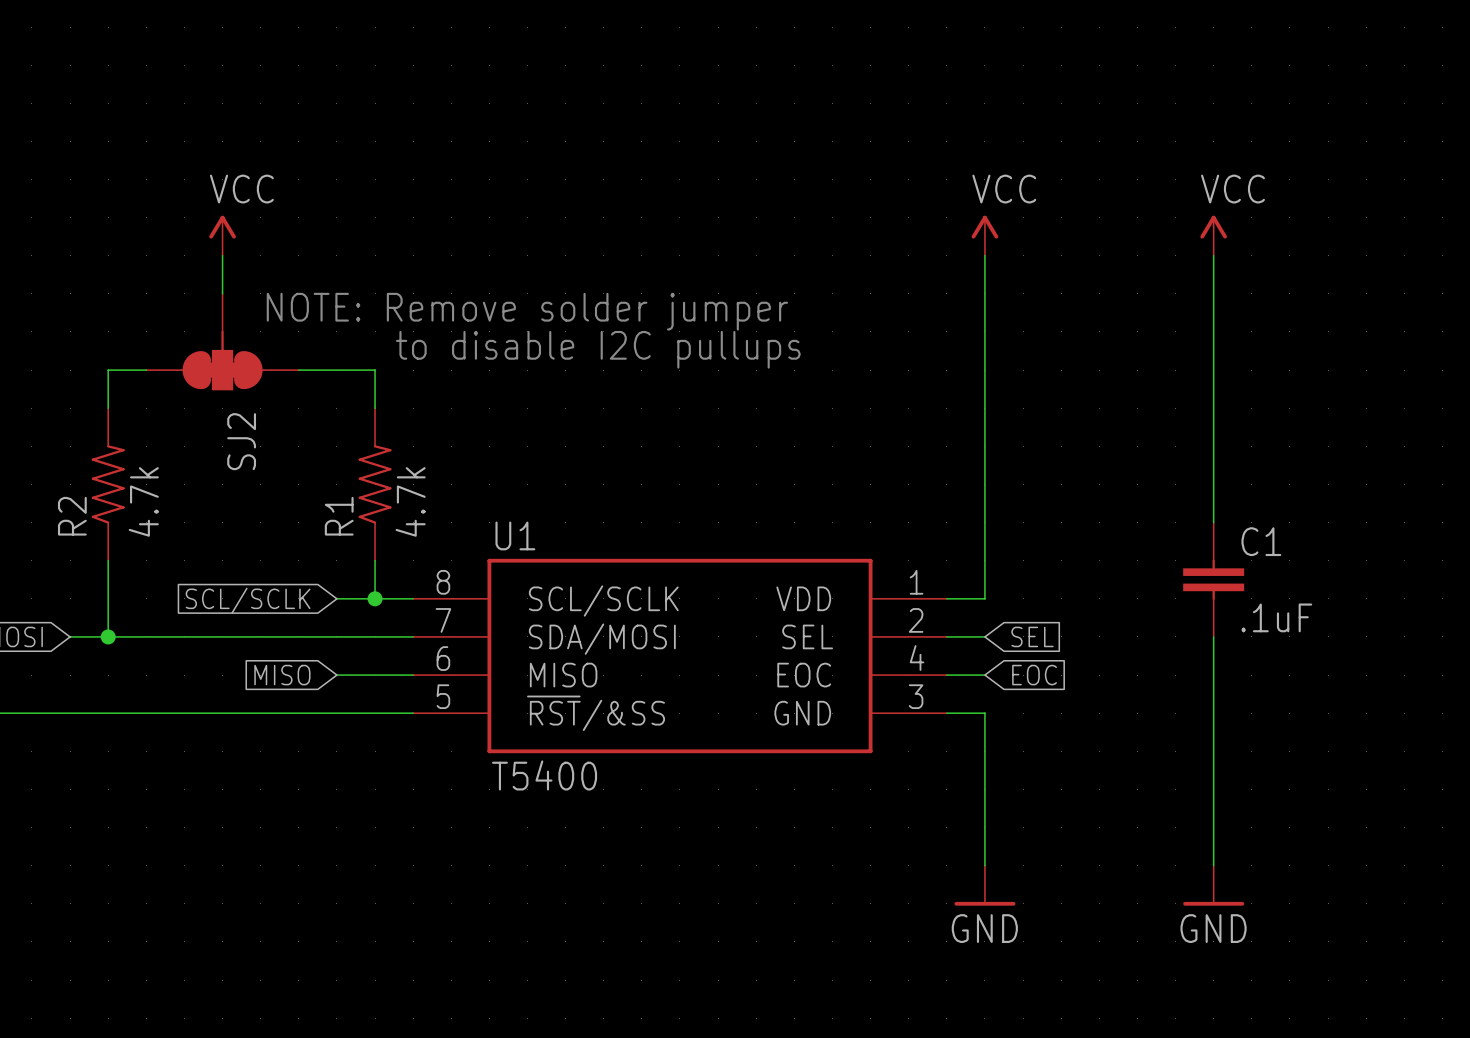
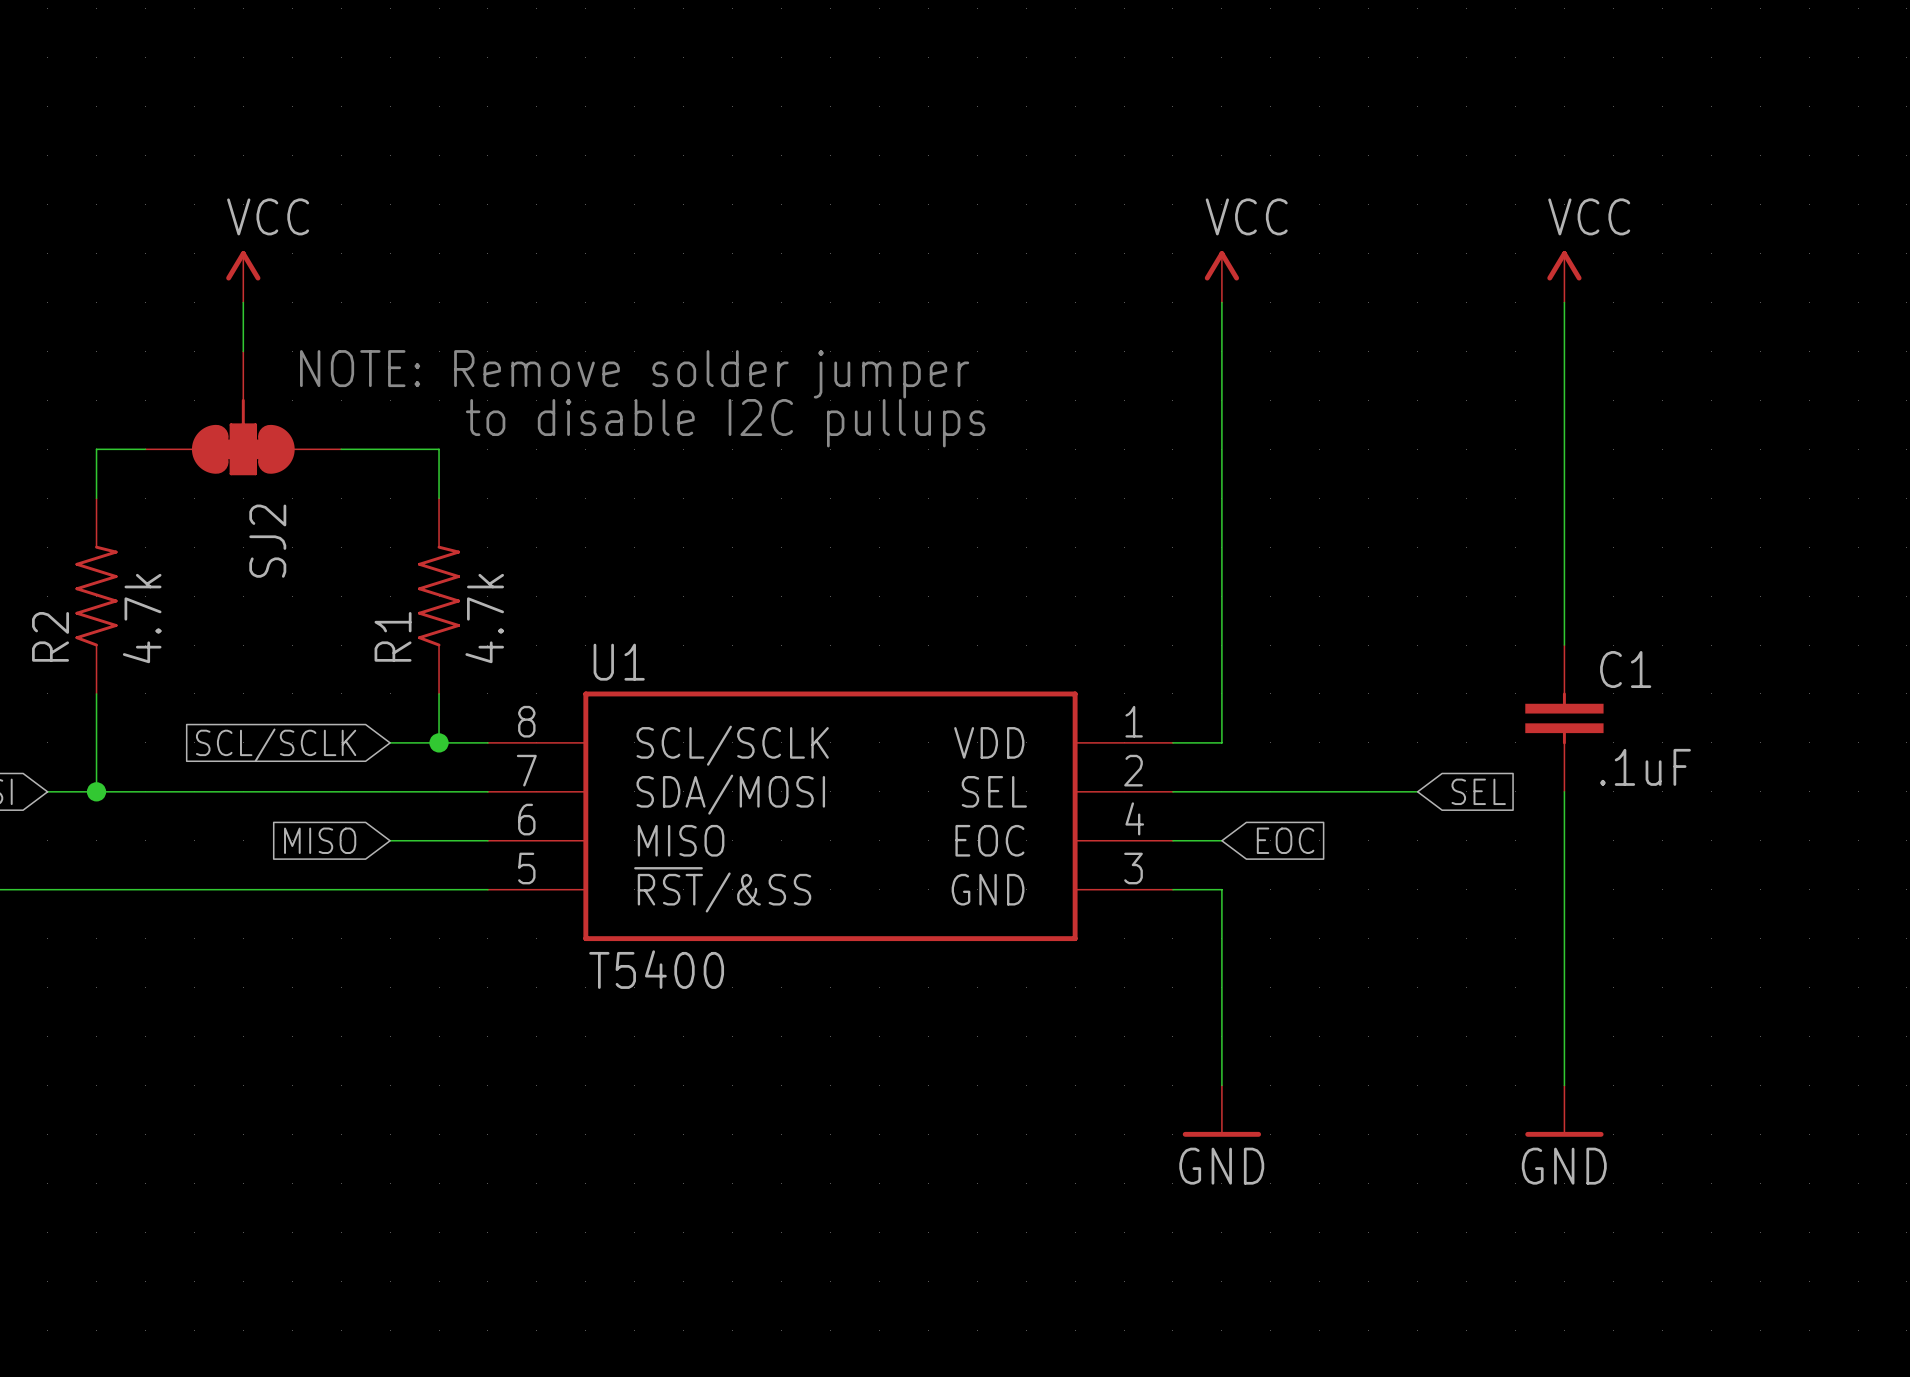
power symbol position: VCC (1213, 235) -> VCC (1564, 276)
wire: (1213, 255) (1213, 522) -> (1564, 302) (1564, 645)
C1 position: (1213, 579) -> (1564, 718)
wire: none -> (1221, 791) (1417, 791)
global label position: SEL (1032, 636) -> SEL (1478, 791)
wire: (1213, 636) (1213, 865) -> (1564, 791) (1564, 1085)
power symbol position: GND (1213, 885) -> GND (1564, 1111)

